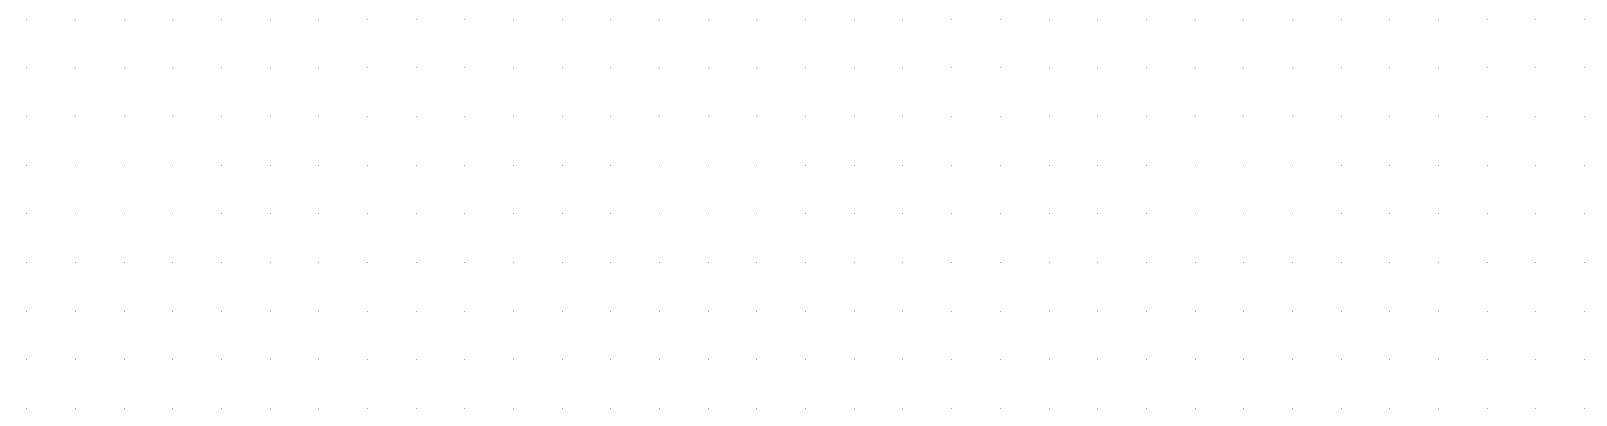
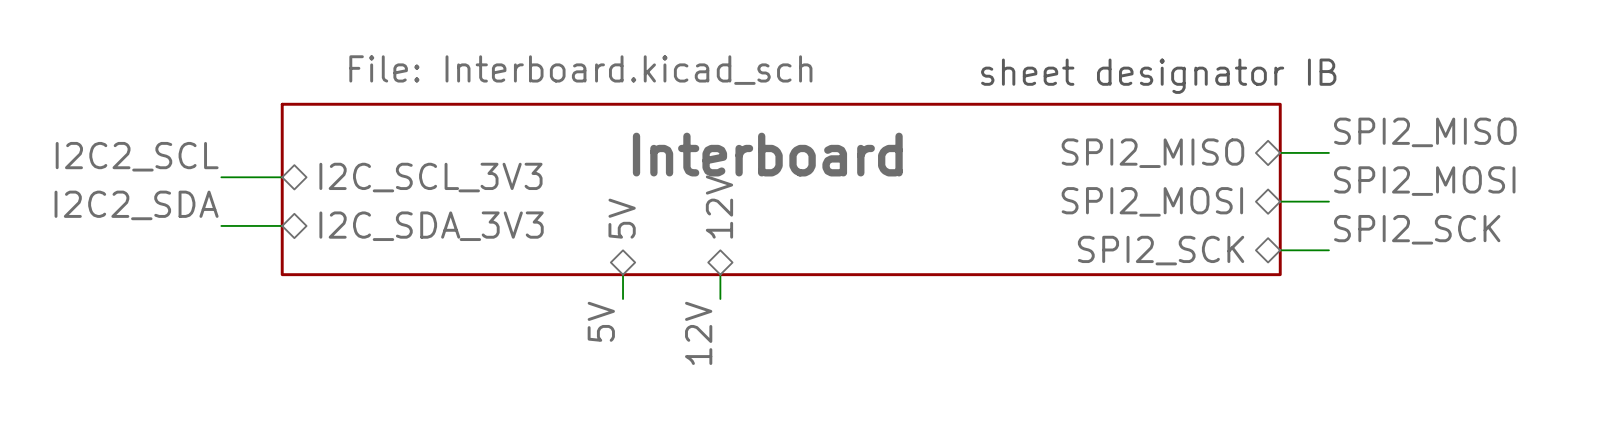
text: none -> sheet designator IB (1158, 76)
label: none -> SPI2_MISO (1425, 132)
wire: none -> (1280, 152) (1328, 152)
sheet pin: none -> SPI2_MISO (1152, 153)
label: none -> I2C2_SCL (137, 156)
wire: none -> (221, 177) (282, 177)
sheet pin: none -> I2C_SCL_3V3 (430, 177)
label: none -> SPI2_MOSI (1424, 181)
sheet Interboard: none -> File: Interboard.kicad_sch (781, 189)
sheet pin: none -> SPI2_MOSI (1152, 201)
wire: none -> (1280, 201) (1328, 201)
label: none -> I2C2_SDA (136, 205)
sheet pin: none -> 12V (719, 207)
sheet pin: none -> 5V (622, 218)
wire: none -> (221, 225) (282, 225)
sheet pin: none -> I2C_SDA_3V3 (431, 226)
label: none -> SPI2_SCK (1417, 229)
sheet pin: none -> SPI2_SCK (1161, 250)
wire: none -> (1280, 250) (1328, 250)
wire: none -> (623, 274) (623, 299)
wire: none -> (720, 274) (720, 299)
label: none -> 5V (601, 321)
label: none -> 12V (698, 333)

